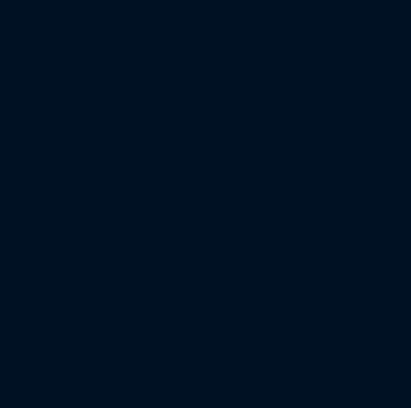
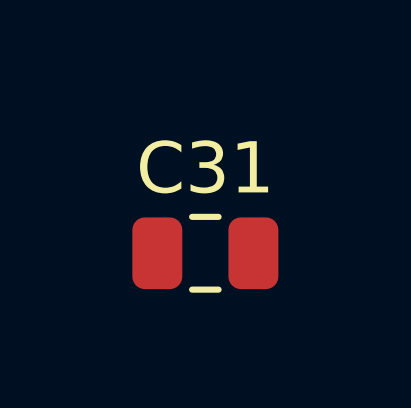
C31: none -> (205, 253)

